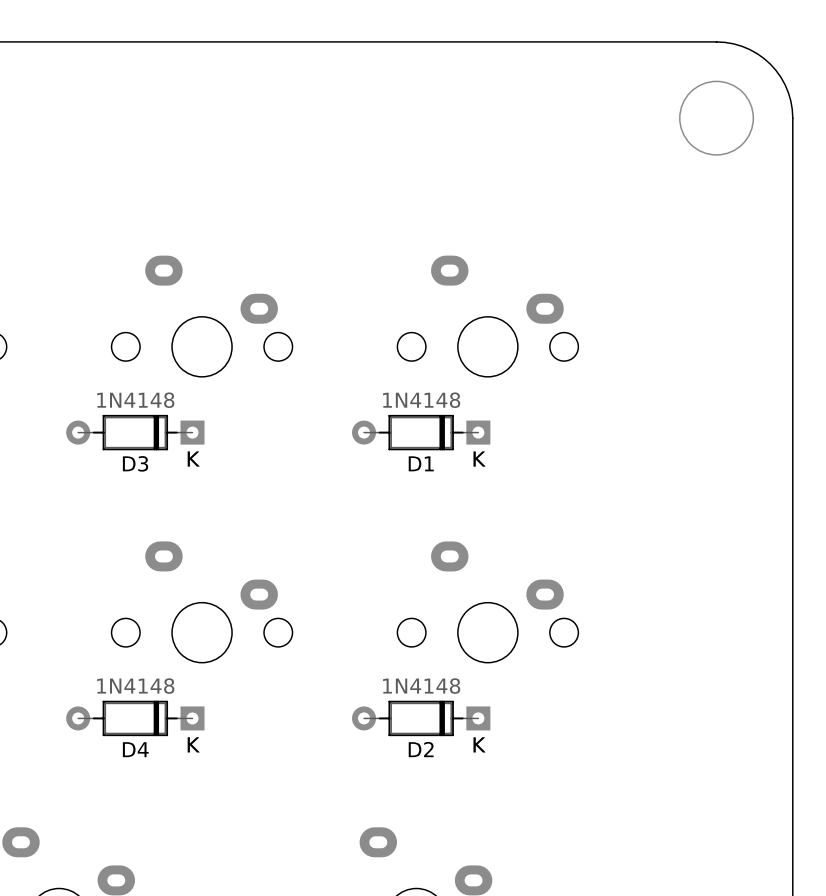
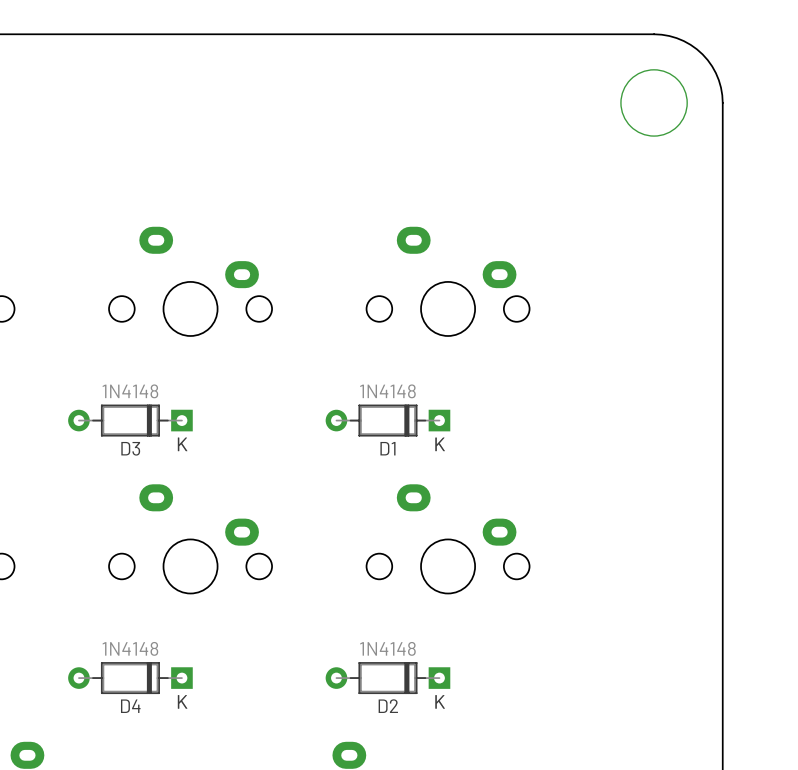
D3 position: (135, 432) -> (130, 420)
D1 position: (421, 432) -> (387, 420)
D4 position: (135, 718) -> (130, 678)
D2 position: (421, 718) -> (387, 678)

